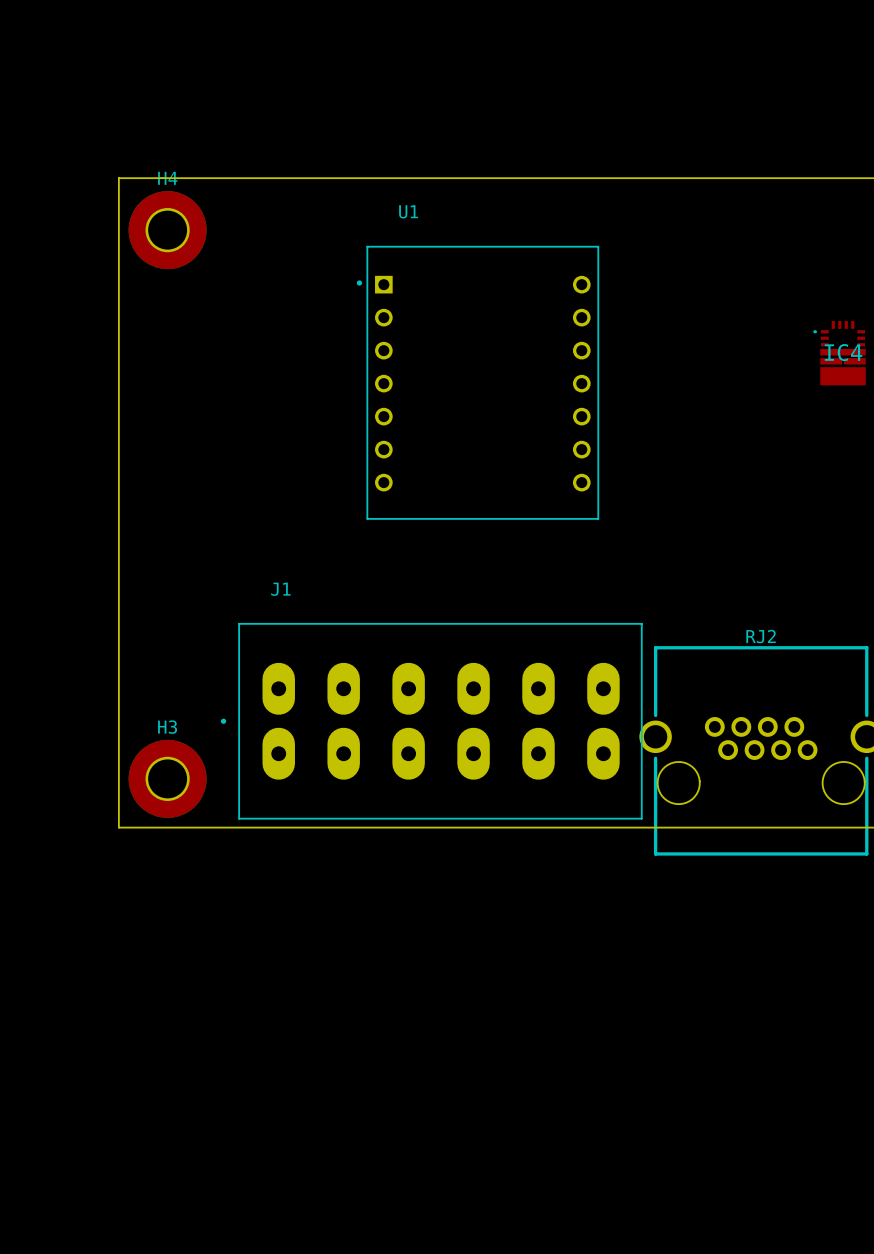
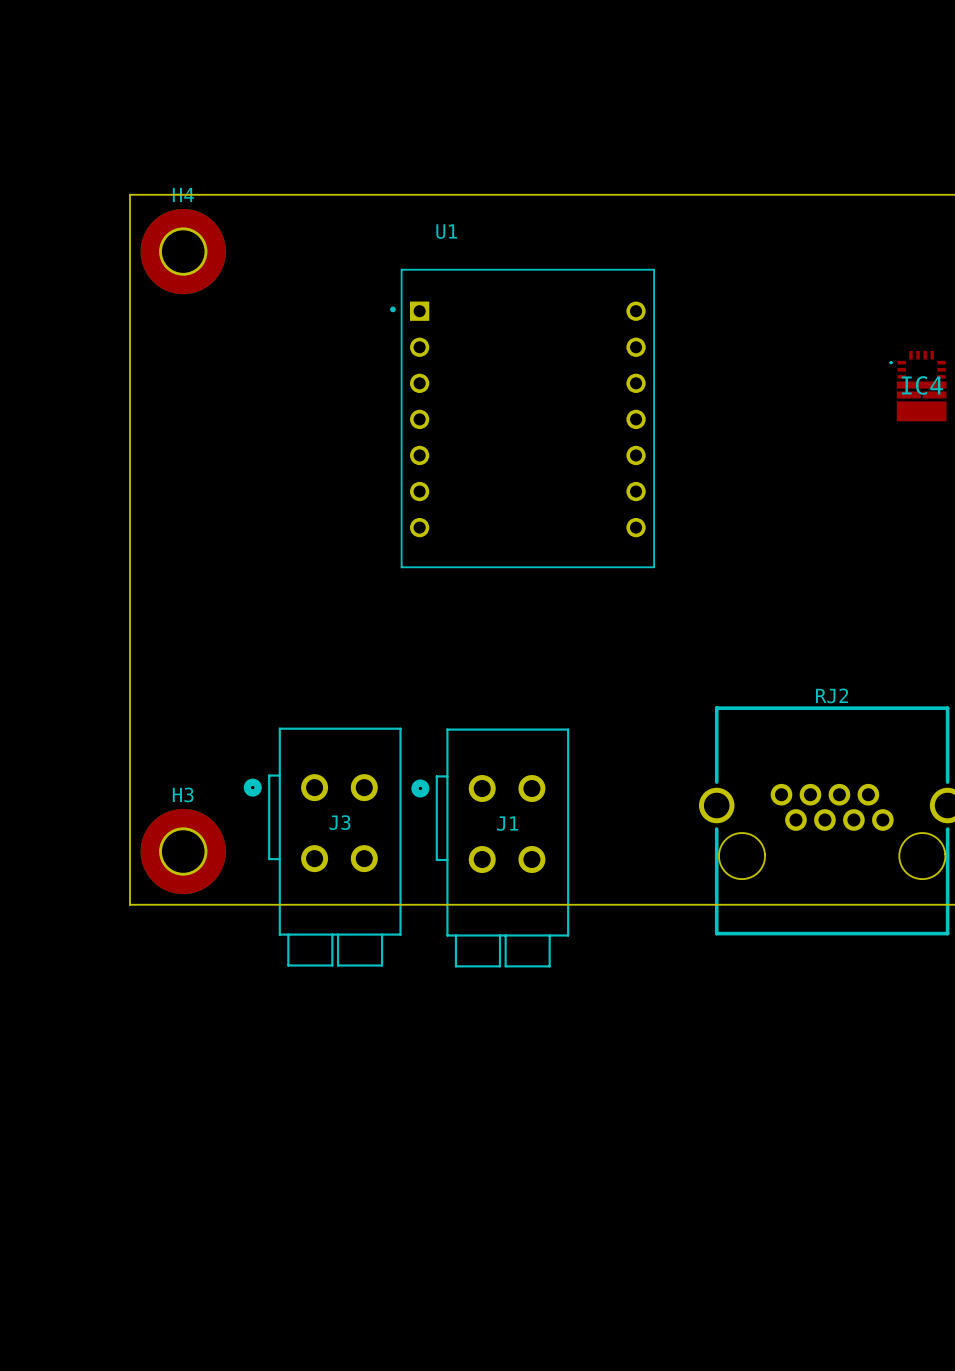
J1 name position: J1 (280, 589) -> J1 (507, 823)
J1 footprint: [220, 623, 643, 820] -> [411, 728, 570, 968]
J3: none -> (322, 847)

